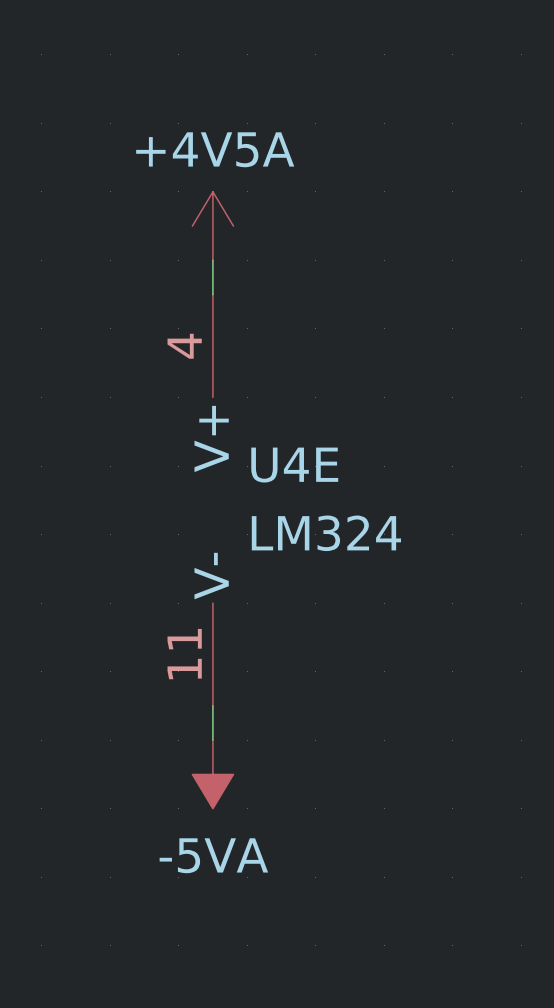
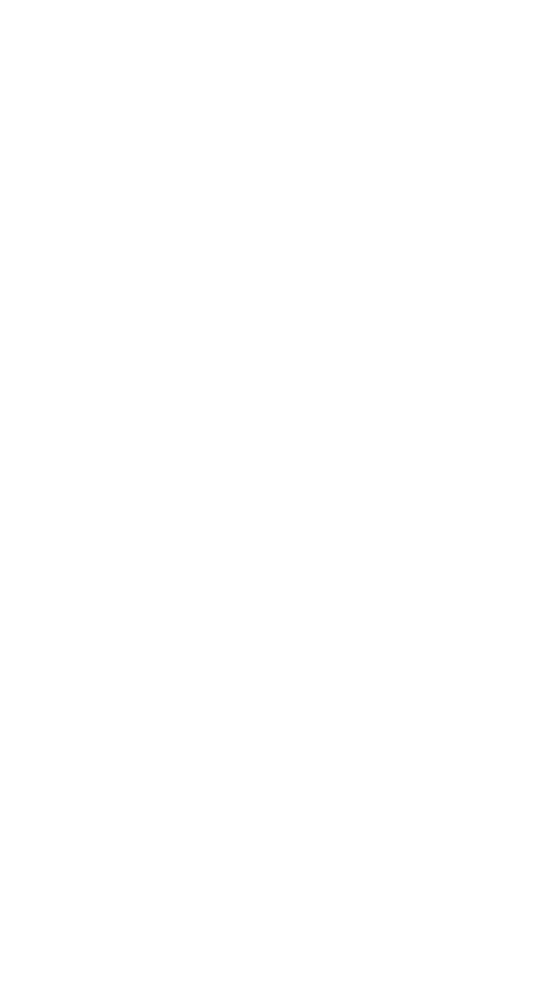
power symbol: +4V5A (212, 226) -> none
wire: (212, 260) (212, 294) -> none
U4E: LM324 (212, 500) -> none
wire: (212, 705) (212, 740) -> none
power symbol: -5VA (212, 774) -> none

